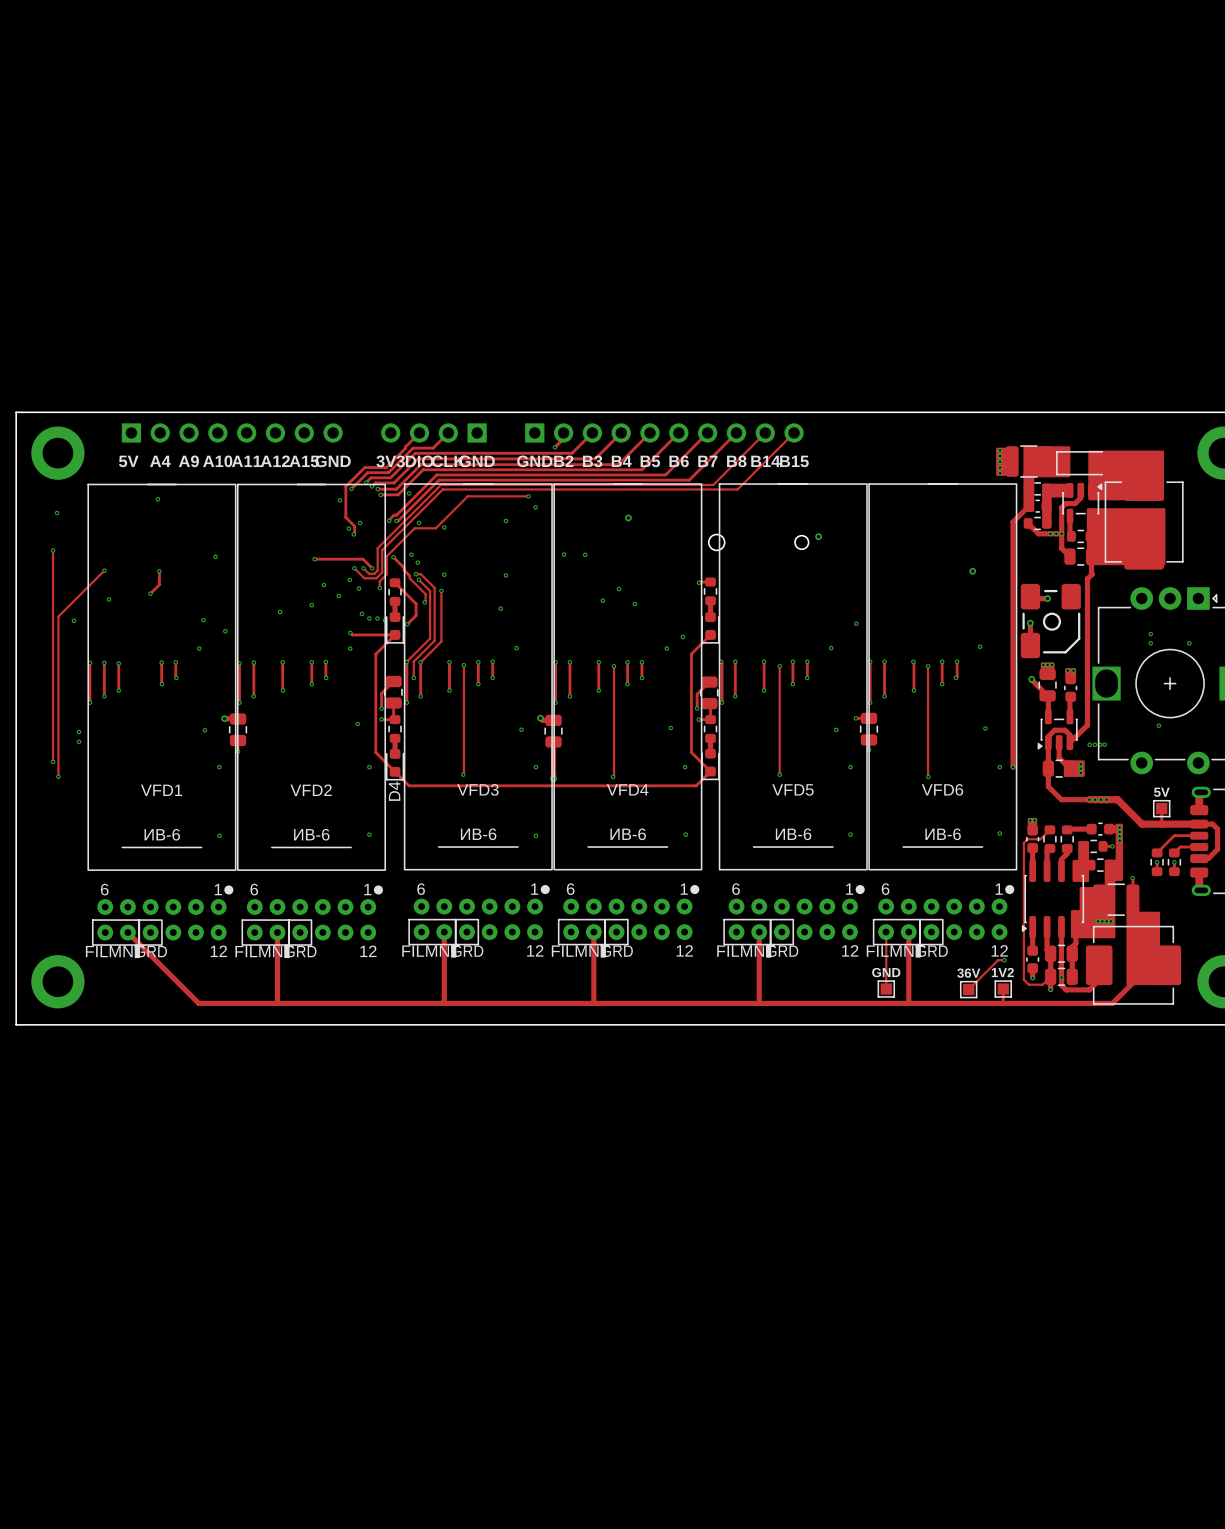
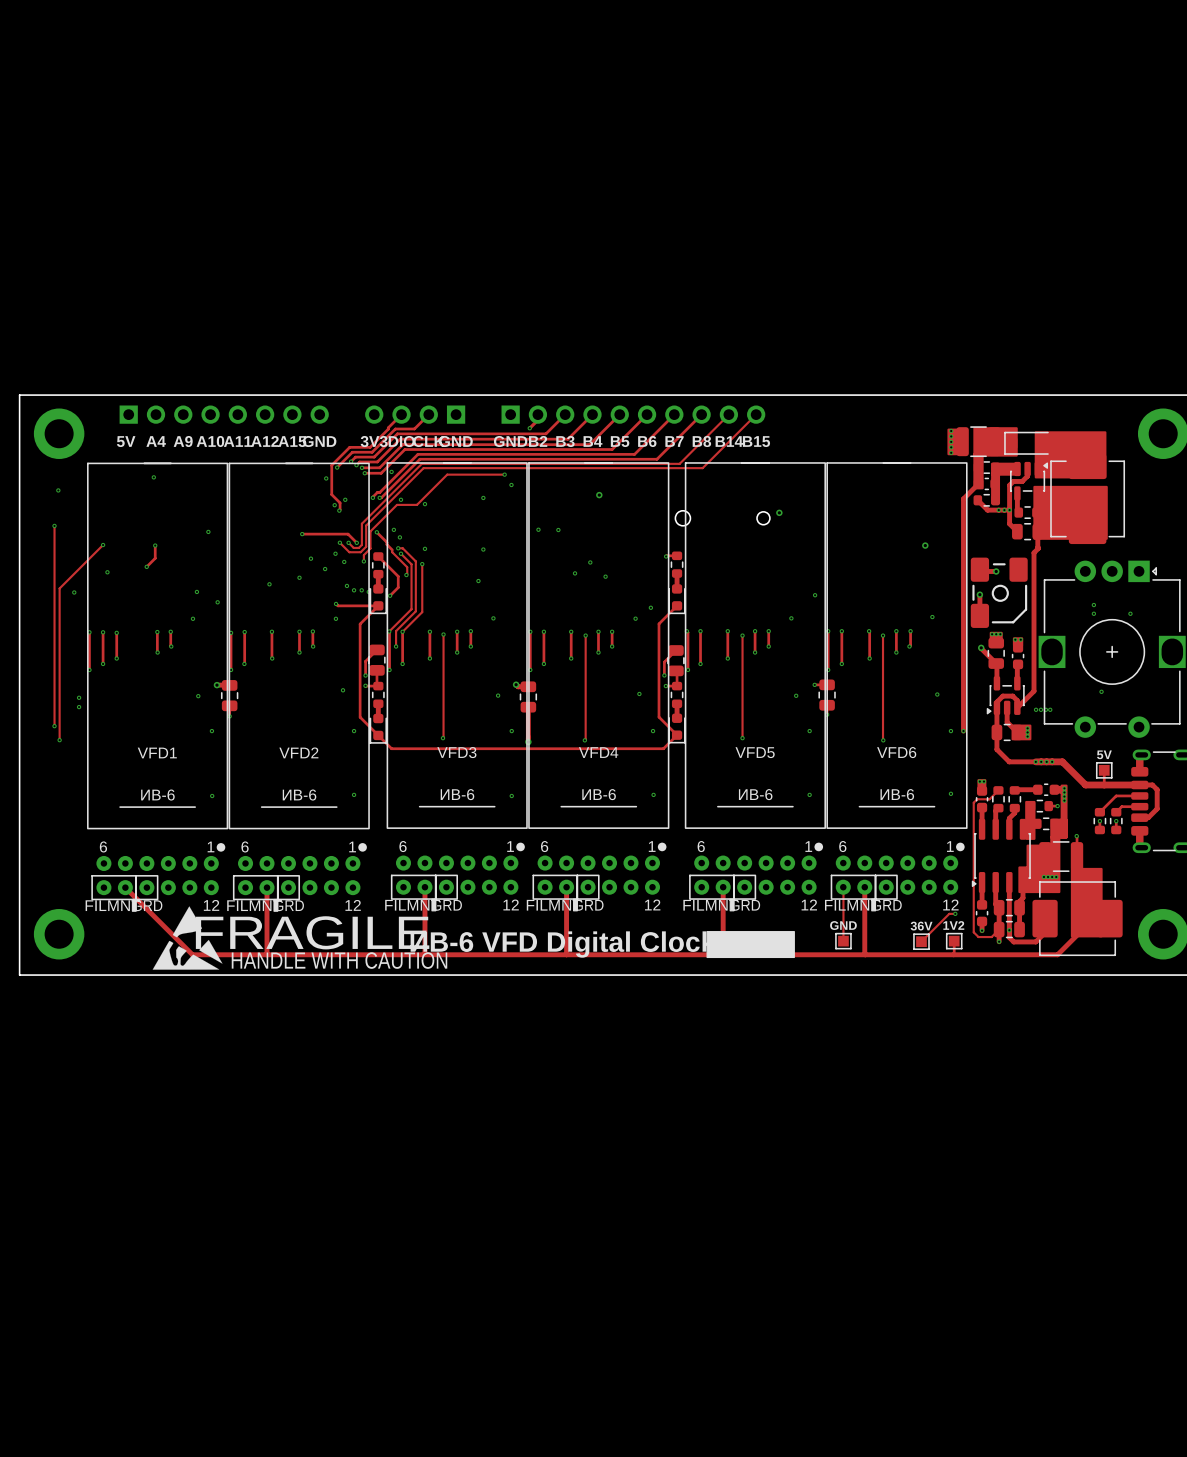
D4 name: D4 (394, 791) -> none
drawing: none -> [152, 906, 223, 970]
drawing: none -> [706, 931, 795, 959]
text: none -> FRAGILE (312, 932)
text: none -> ИВ-6 VFD Digital Clock (563, 944)
text: none -> HANDLE WITH CAUTION (339, 960)

